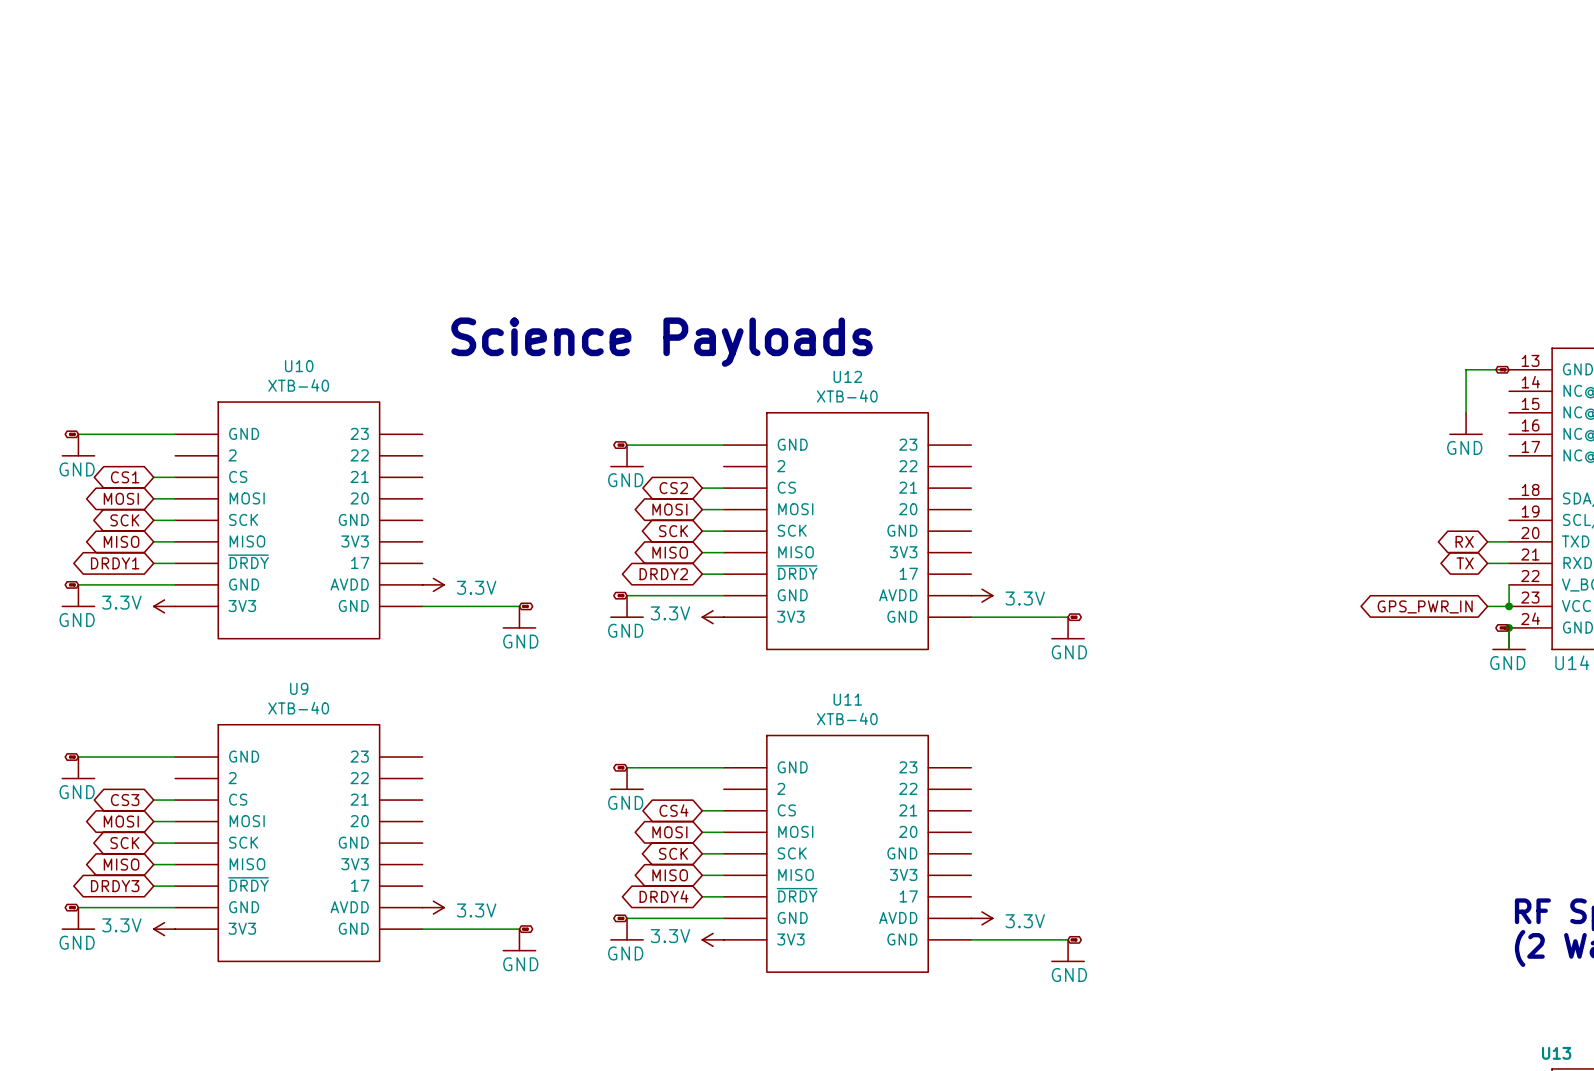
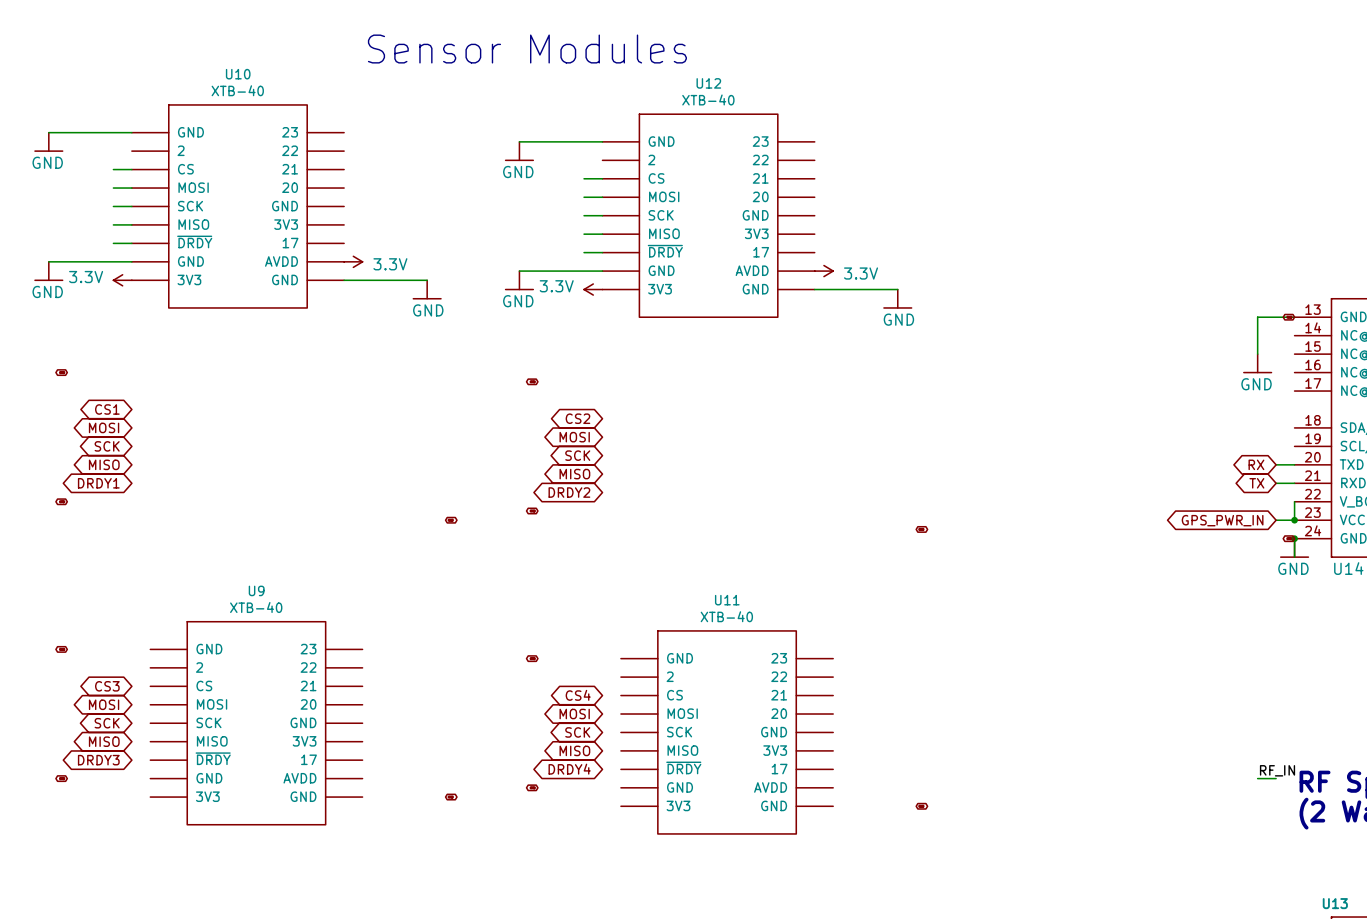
text: none -> Sensor Modules (527, 49)
wire: none -> (48, 132) (131, 132)
power symbol: none -> GND (48, 141)
wire: none -> (519, 141) (602, 141)
power symbol: none -> GND (519, 151)
wire: none -> (113, 169) (131, 169)
wire: none -> (584, 178) (602, 178)
wire: none -> (113, 188) (131, 188)
wire: none -> (584, 197) (602, 197)
wire: none -> (113, 206) (131, 206)
wire: none -> (584, 215) (602, 215)
wire: none -> (113, 224) (131, 224)
wire: none -> (584, 234) (602, 234)
power symbol: none -> 3.3V (353, 261)
power symbol: none -> 3.3V (823, 271)
power symbol: none -> 3.3V (122, 280)
wire: none -> (344, 280) (427, 280)
power symbol: none -> GND (519, 280)
power symbol: none -> GND (427, 289)
power symbol: none -> 3.3V (593, 289)
wire: none -> (814, 289) (897, 289)
text: Science Payloads (662, 342) -> none
power symbol: none -> GND (897, 298)
wire: (78, 434) (175, 434) -> (48, 261) (131, 261)
power symbol position: GND (78, 445) -> GND (48, 271)
wire: (627, 445) (723, 445) -> (519, 271) (602, 271)
power symbol: GND (627, 455) -> none
wire: (153, 477) (175, 477) -> (113, 243) (131, 243)
wire: (702, 488) (723, 488) -> (584, 252) (602, 252)
wire: (153, 498) (175, 498) -> none
wire: (702, 509) (723, 509) -> none
wire: (153, 520) (175, 520) -> none
U10 position: (298, 520) -> (237, 206)
wire: (702, 531) (723, 531) -> none
U12 position: (847, 531) -> (708, 215)
wire: (153, 541) (175, 541) -> none
wire: (702, 552) (723, 552) -> none
wire: (153, 563) (175, 563) -> none
wire: (702, 574) (723, 574) -> none
wire: (78, 584) (175, 584) -> none
power symbol: 3.3V (433, 584) -> none
power symbol: GND (78, 595) -> none
wire: (627, 595) (723, 595) -> none
power symbol: 3.3V (982, 595) -> none
power symbol: 3.3V (164, 606) -> none
wire: (422, 606) (519, 606) -> none
power symbol: GND (627, 606) -> none
power symbol: GND (519, 617) -> none
power symbol: 3.3V (713, 617) -> none
wire: (971, 617) (1068, 617) -> none
power symbol: GND (1068, 627) -> none
wire: (78, 757) (175, 757) -> none
power symbol: GND (78, 767) -> none
wire: (627, 767) (723, 767) -> none
power symbol: GND (627, 778) -> none
wire: (153, 800) (175, 800) -> none
wire: (702, 810) (723, 810) -> none
wire: (153, 821) (175, 821) -> none
wire: (702, 832) (723, 832) -> none
wire: (153, 843) (175, 843) -> none
wire: (702, 853) (723, 853) -> none
wire: (153, 864) (175, 864) -> none
wire: (702, 875) (723, 875) -> none
wire: (153, 886) (175, 886) -> none
wire: (702, 896) (723, 896) -> none
label: none -> RF_IN (1277, 770)
wire: (78, 907) (175, 907) -> none
power symbol: 3.3V (433, 907) -> none
wire: none -> (1257, 778) (1276, 778)
power symbol: GND (78, 918) -> none
wire: (627, 918) (723, 918) -> none
power symbol: 3.3V (982, 918) -> none
power symbol: 3.3V (164, 929) -> none
wire: (422, 929) (519, 929) -> none
power symbol: GND (627, 929) -> none
power symbol: GND (519, 939) -> none
power symbol: 3.3V (713, 939) -> none
wire: (971, 939) (1068, 939) -> none
power symbol: GND (1068, 950) -> none

